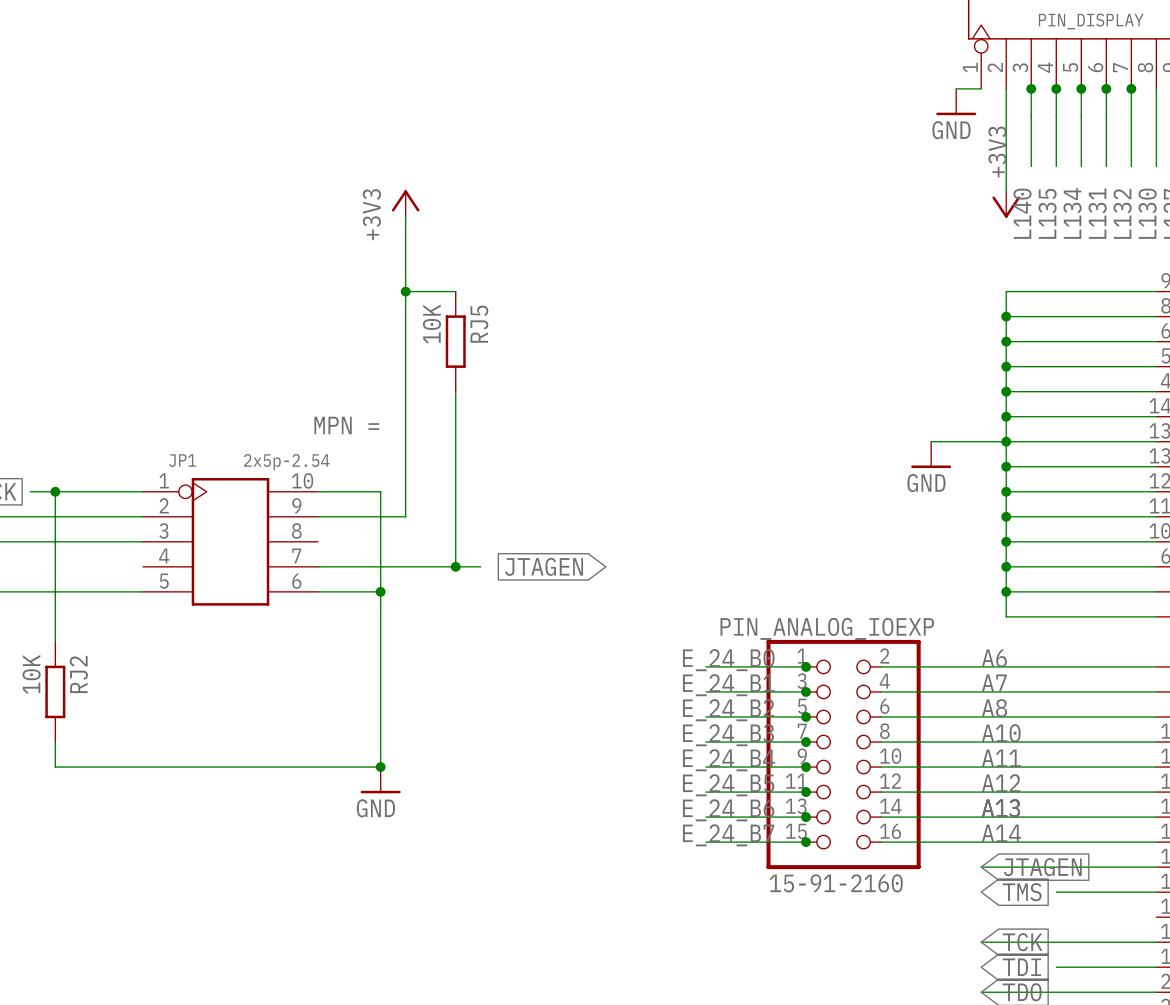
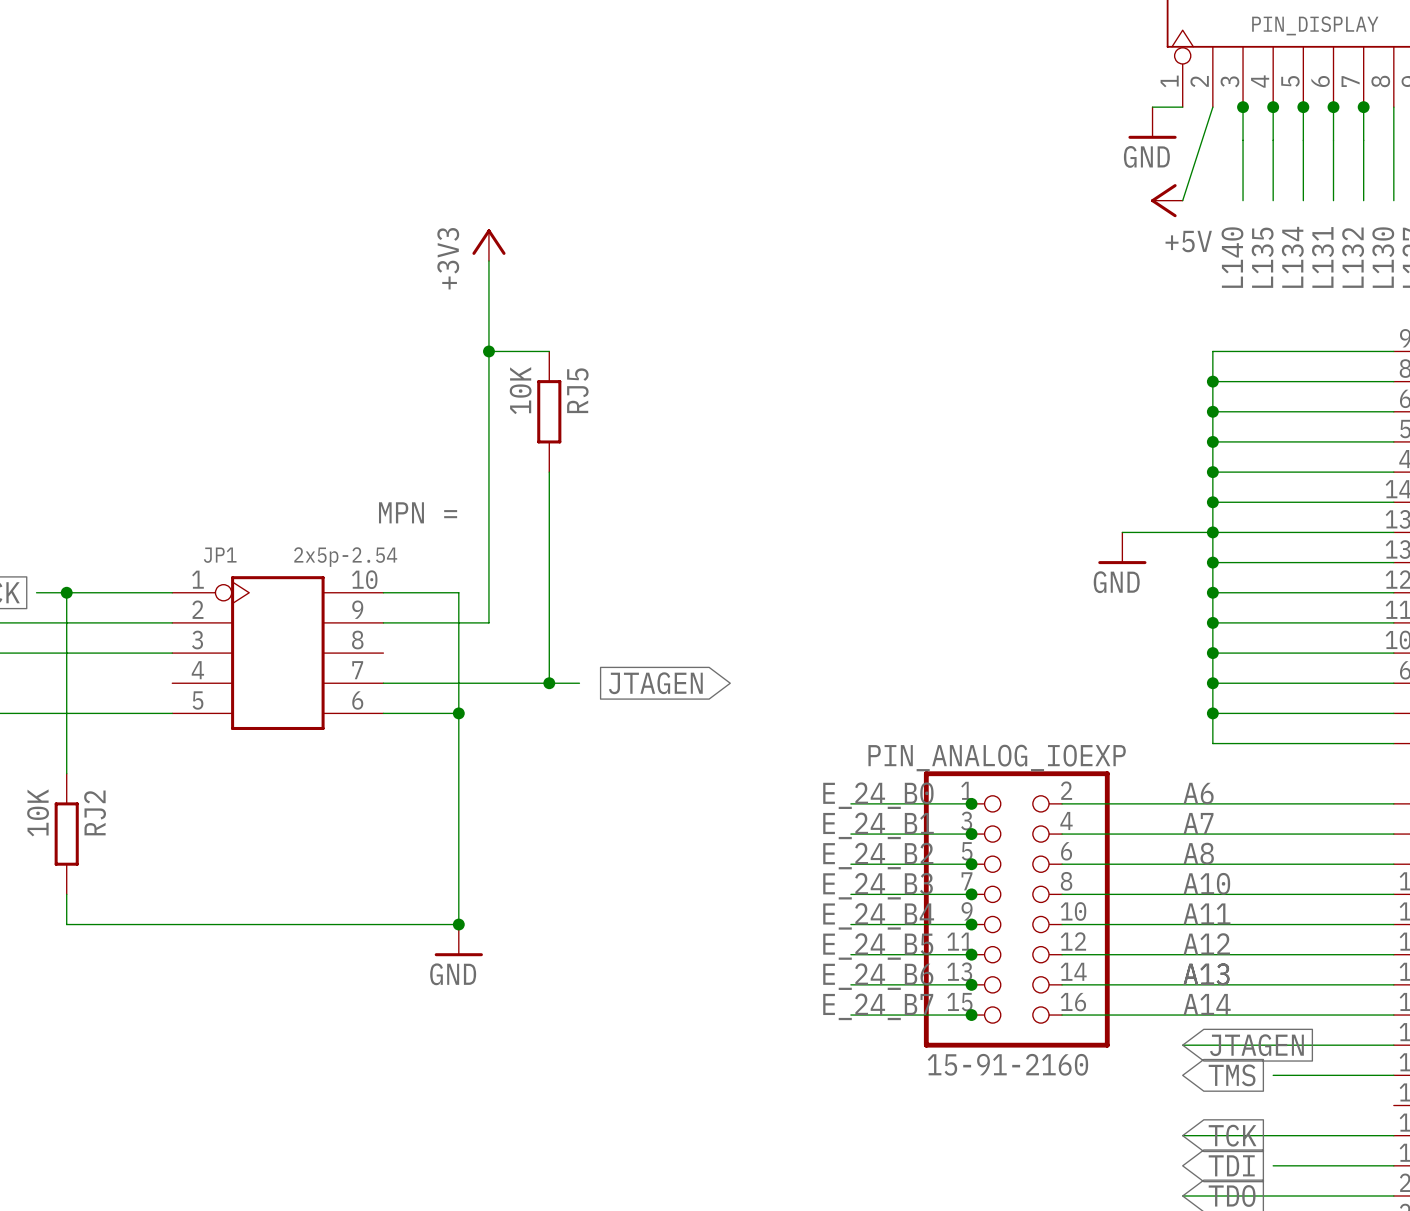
wire: (1006, 88) (1006, 191) -> (1212, 107) (1182, 200)
power symbol: none -> +5V (1166, 200)
power symbol: +3V3 (1006, 204) -> none

